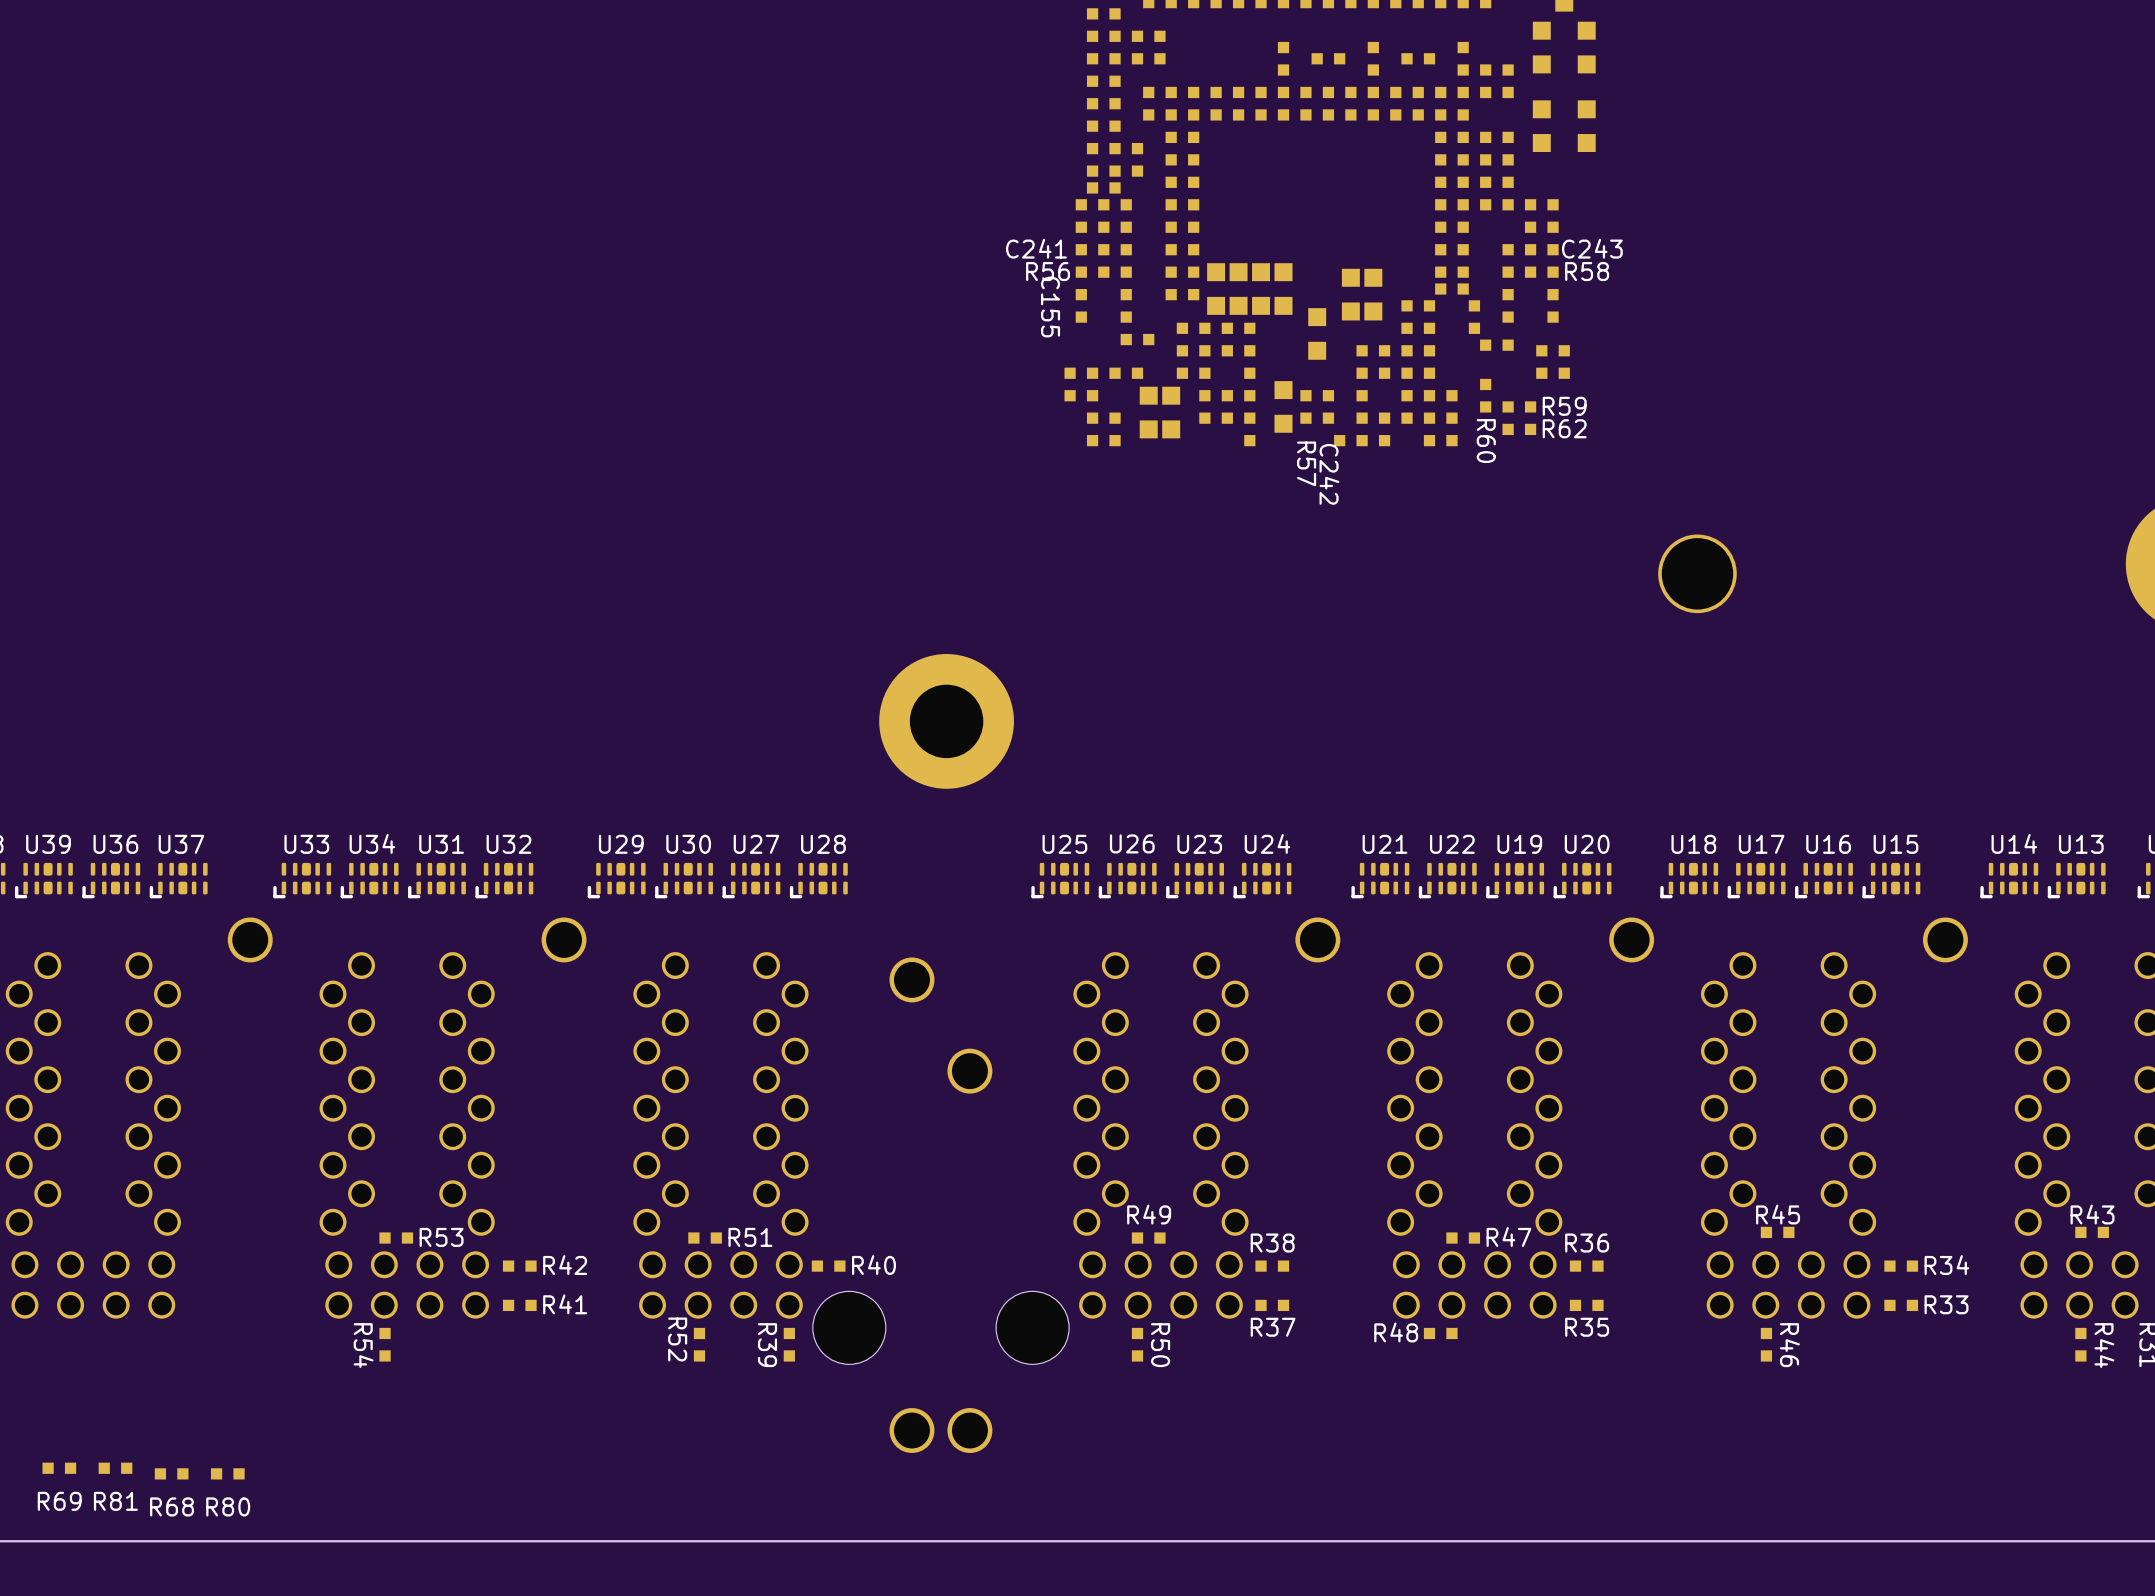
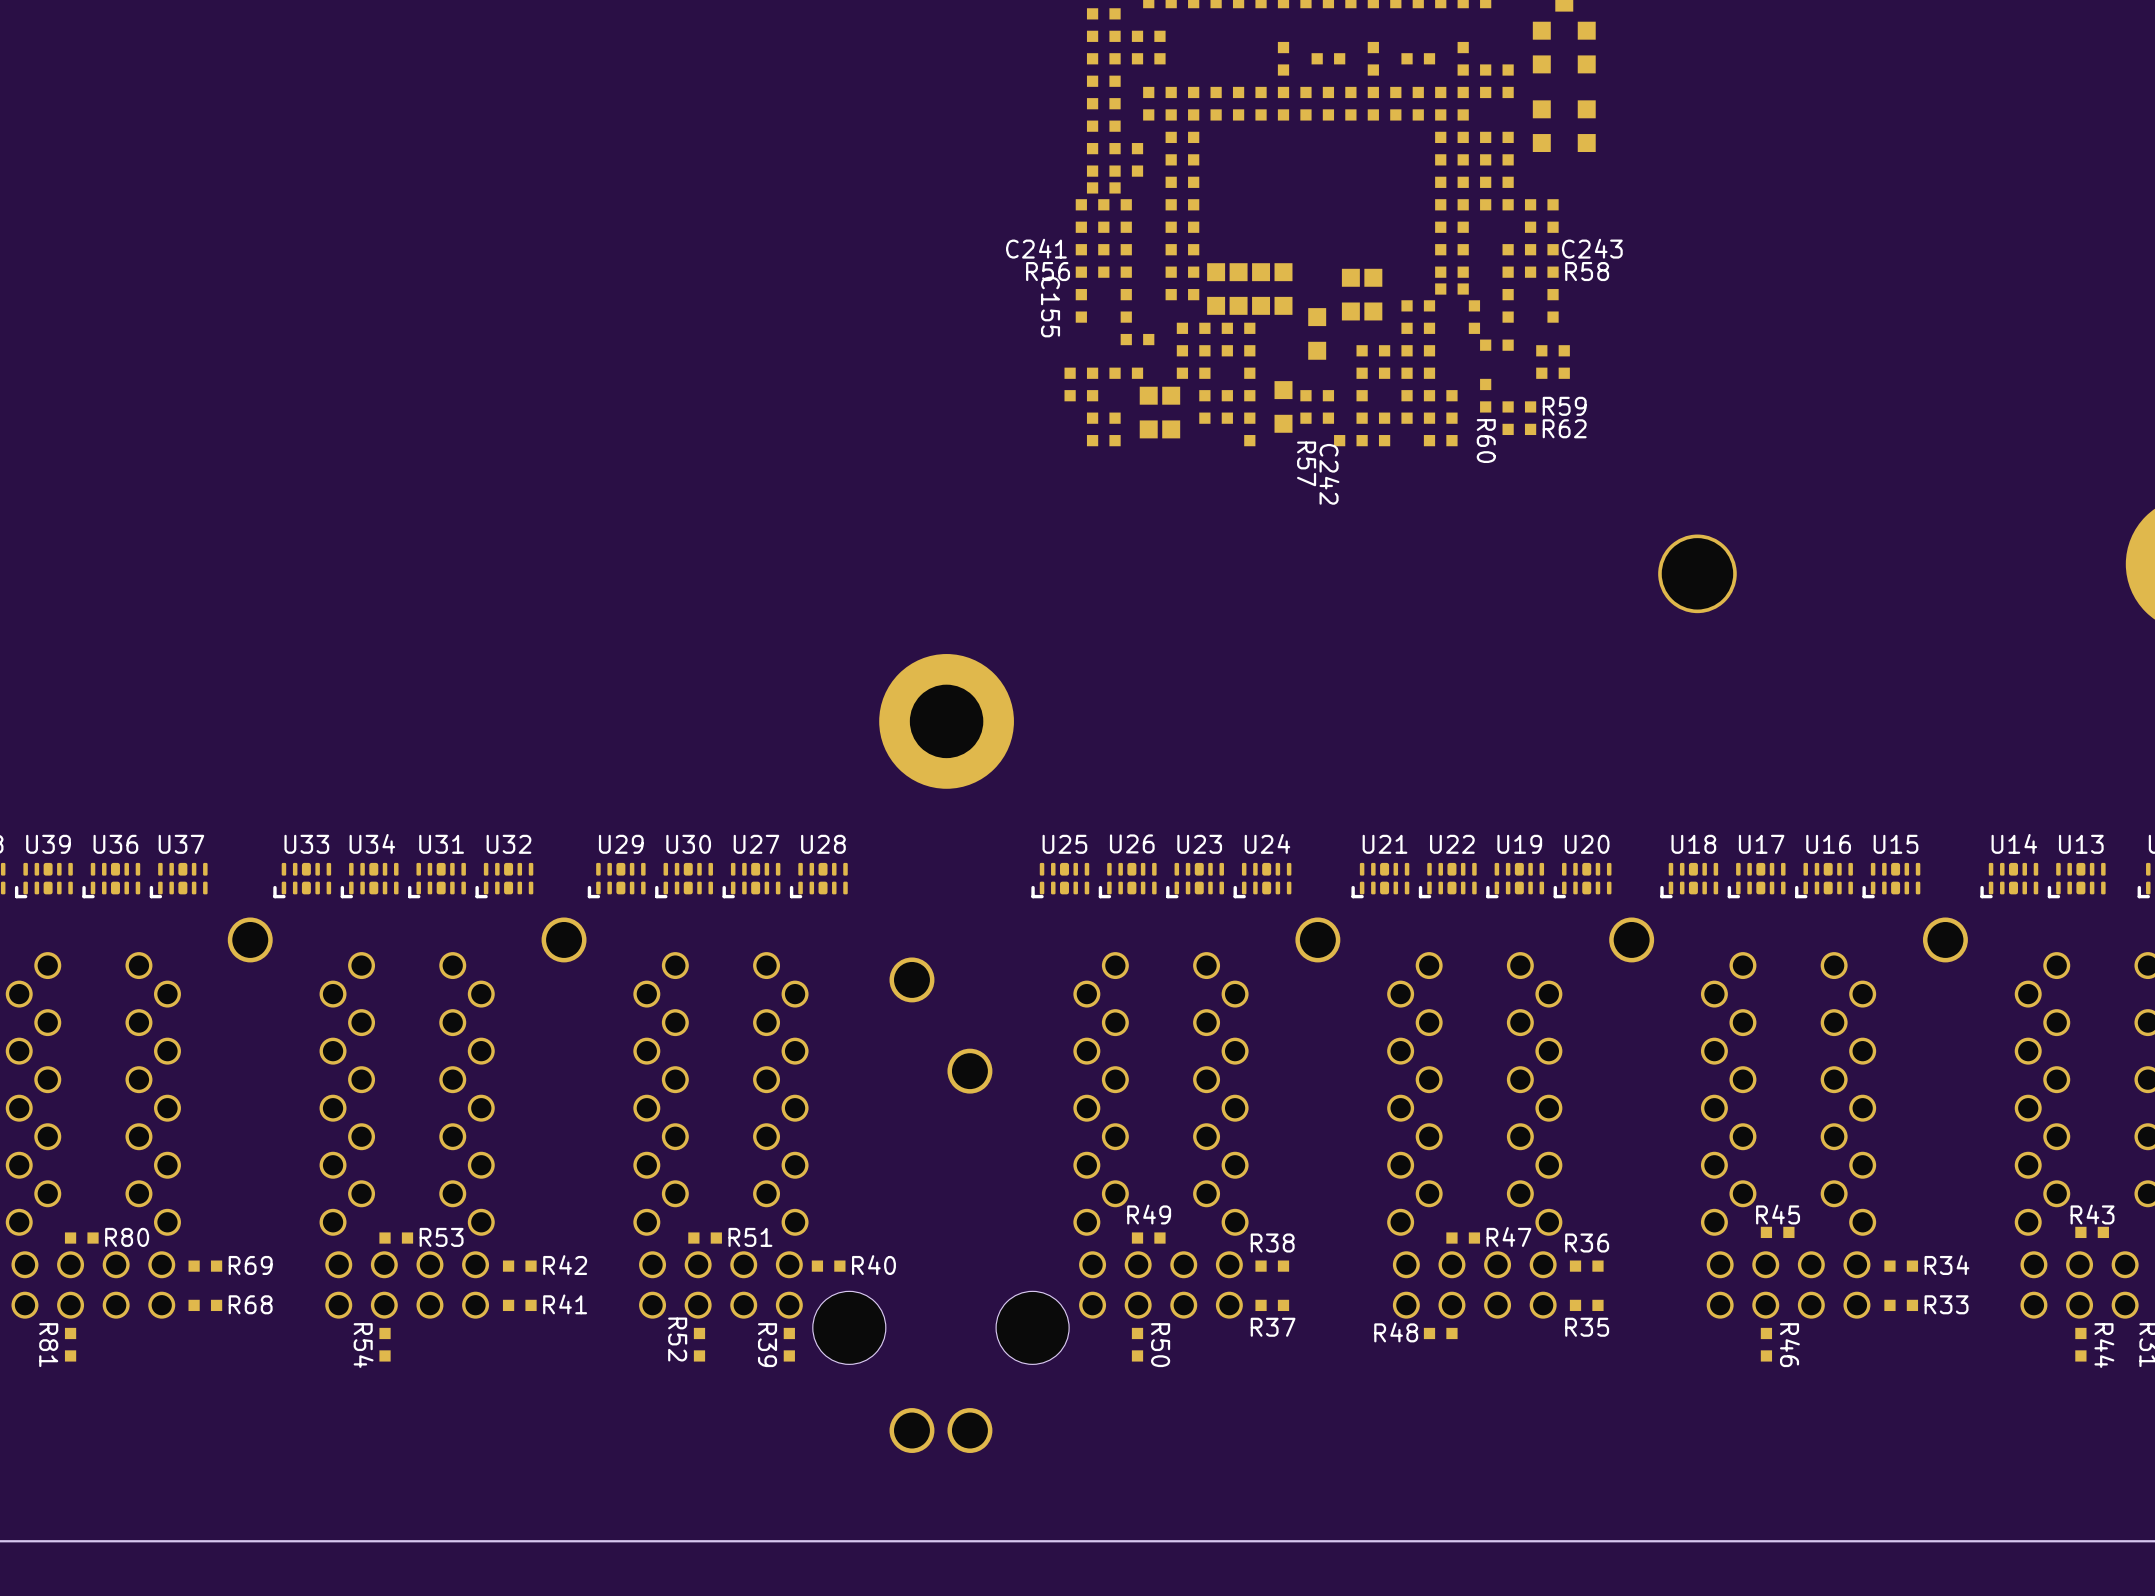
R69 position: (59, 1468) -> (205, 1266)
R81 rotation: 0° (115, 1468) -> 90° clockwise (70, 1344)
R81 position: (115, 1468) -> (70, 1344)
R68 position: (171, 1473) -> (205, 1305)
R80 position: (227, 1473) -> (81, 1238)
R69 name position: R69 (59, 1501) -> R69 (250, 1265)
R68 name position: R68 (172, 1506) -> R68 (250, 1304)
R80 name position: R80 (228, 1506) -> R80 (127, 1237)

